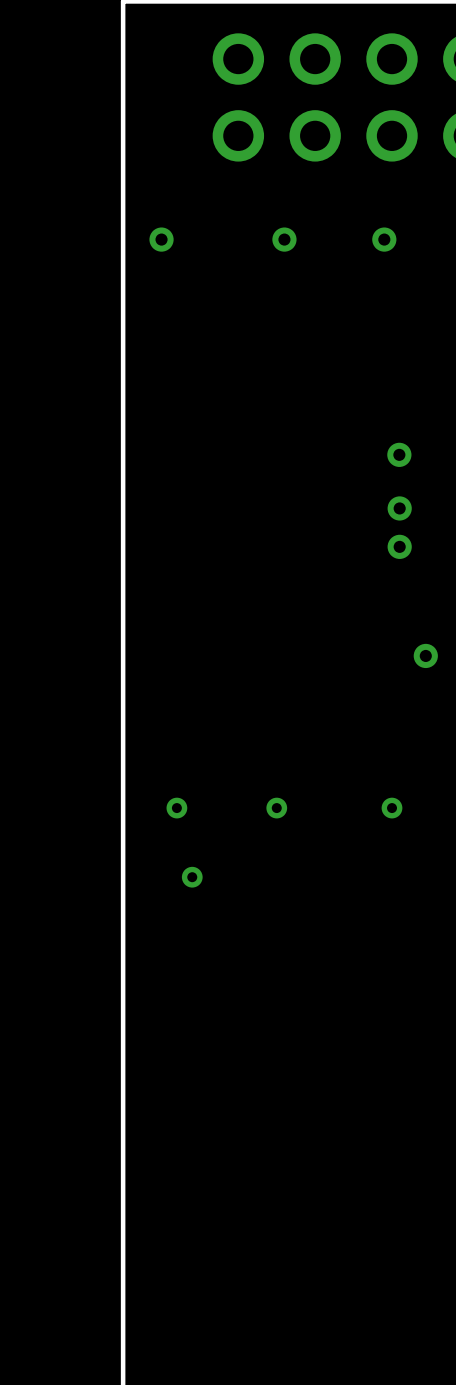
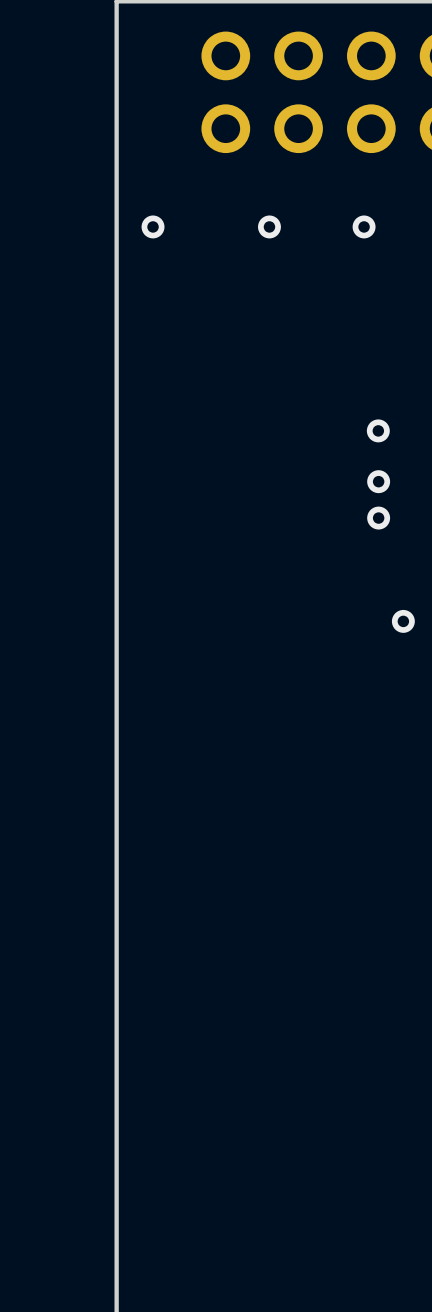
via: (176, 808) -> none
via: (276, 808) -> none
via: (392, 808) -> none
via: (192, 877) -> none

